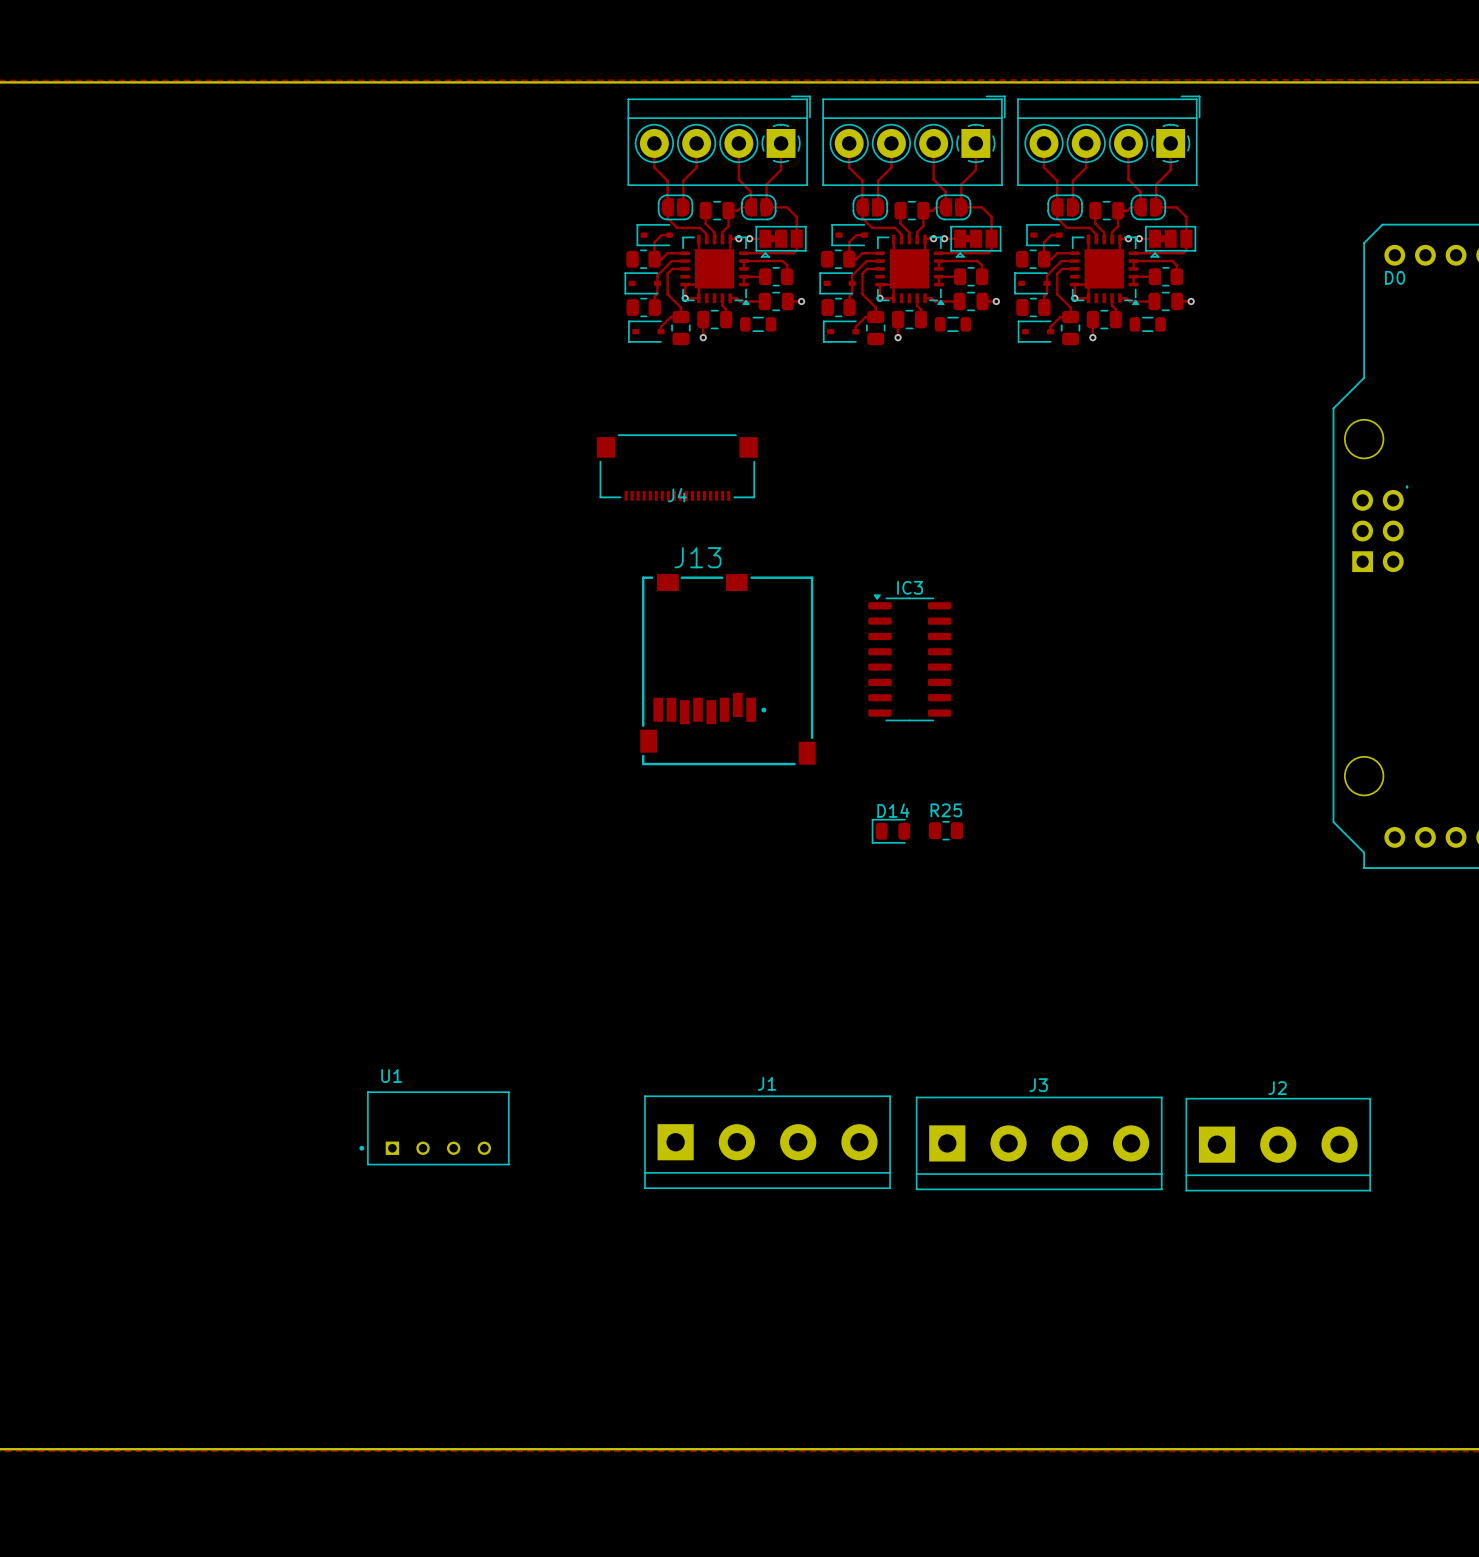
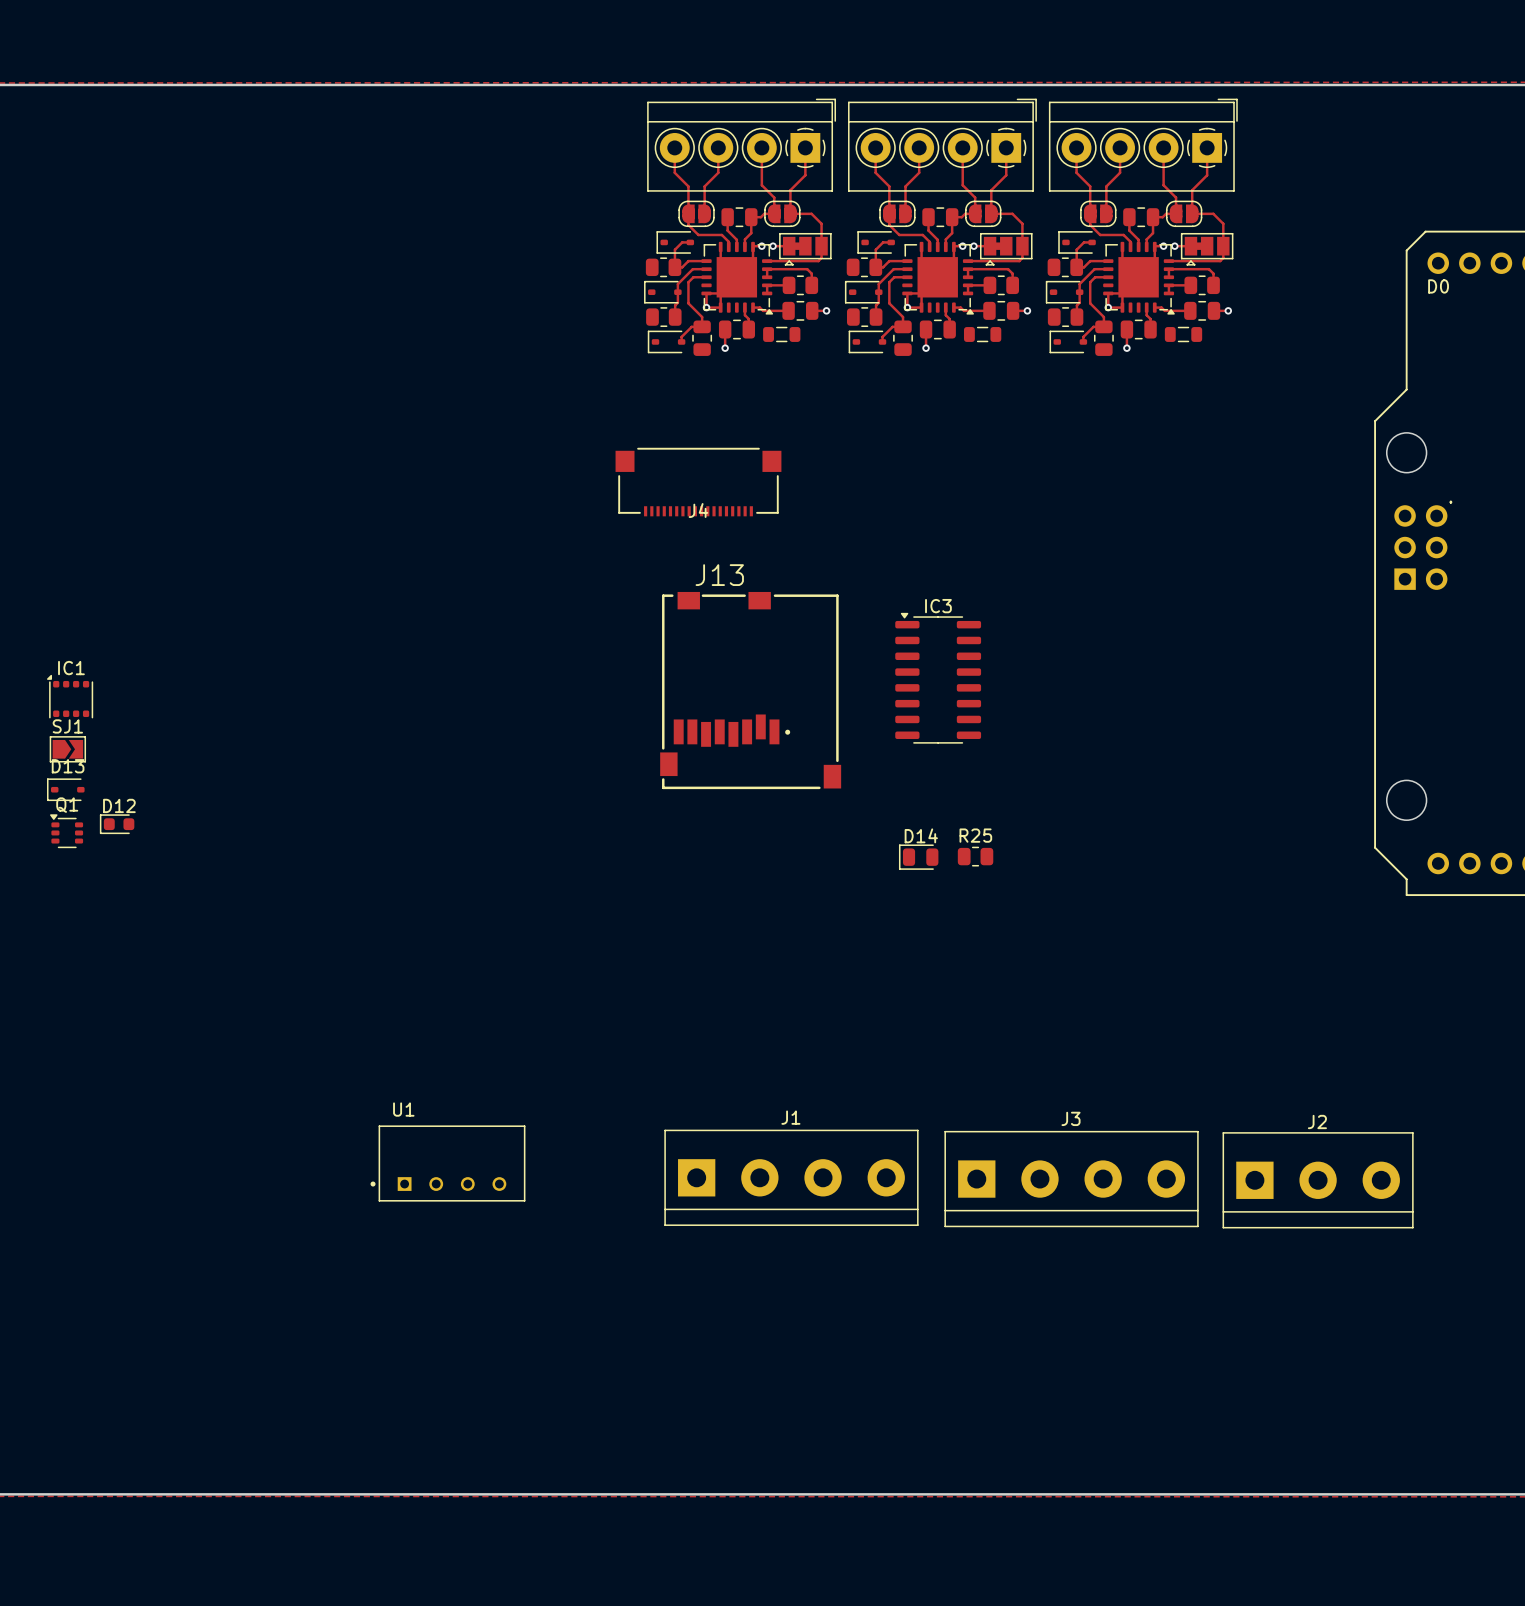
IC1: none -> (70, 696)
SJ1: none -> (67, 749)
D13: none -> (65, 789)
D12: none -> (117, 824)
Q1: none -> (66, 831)

